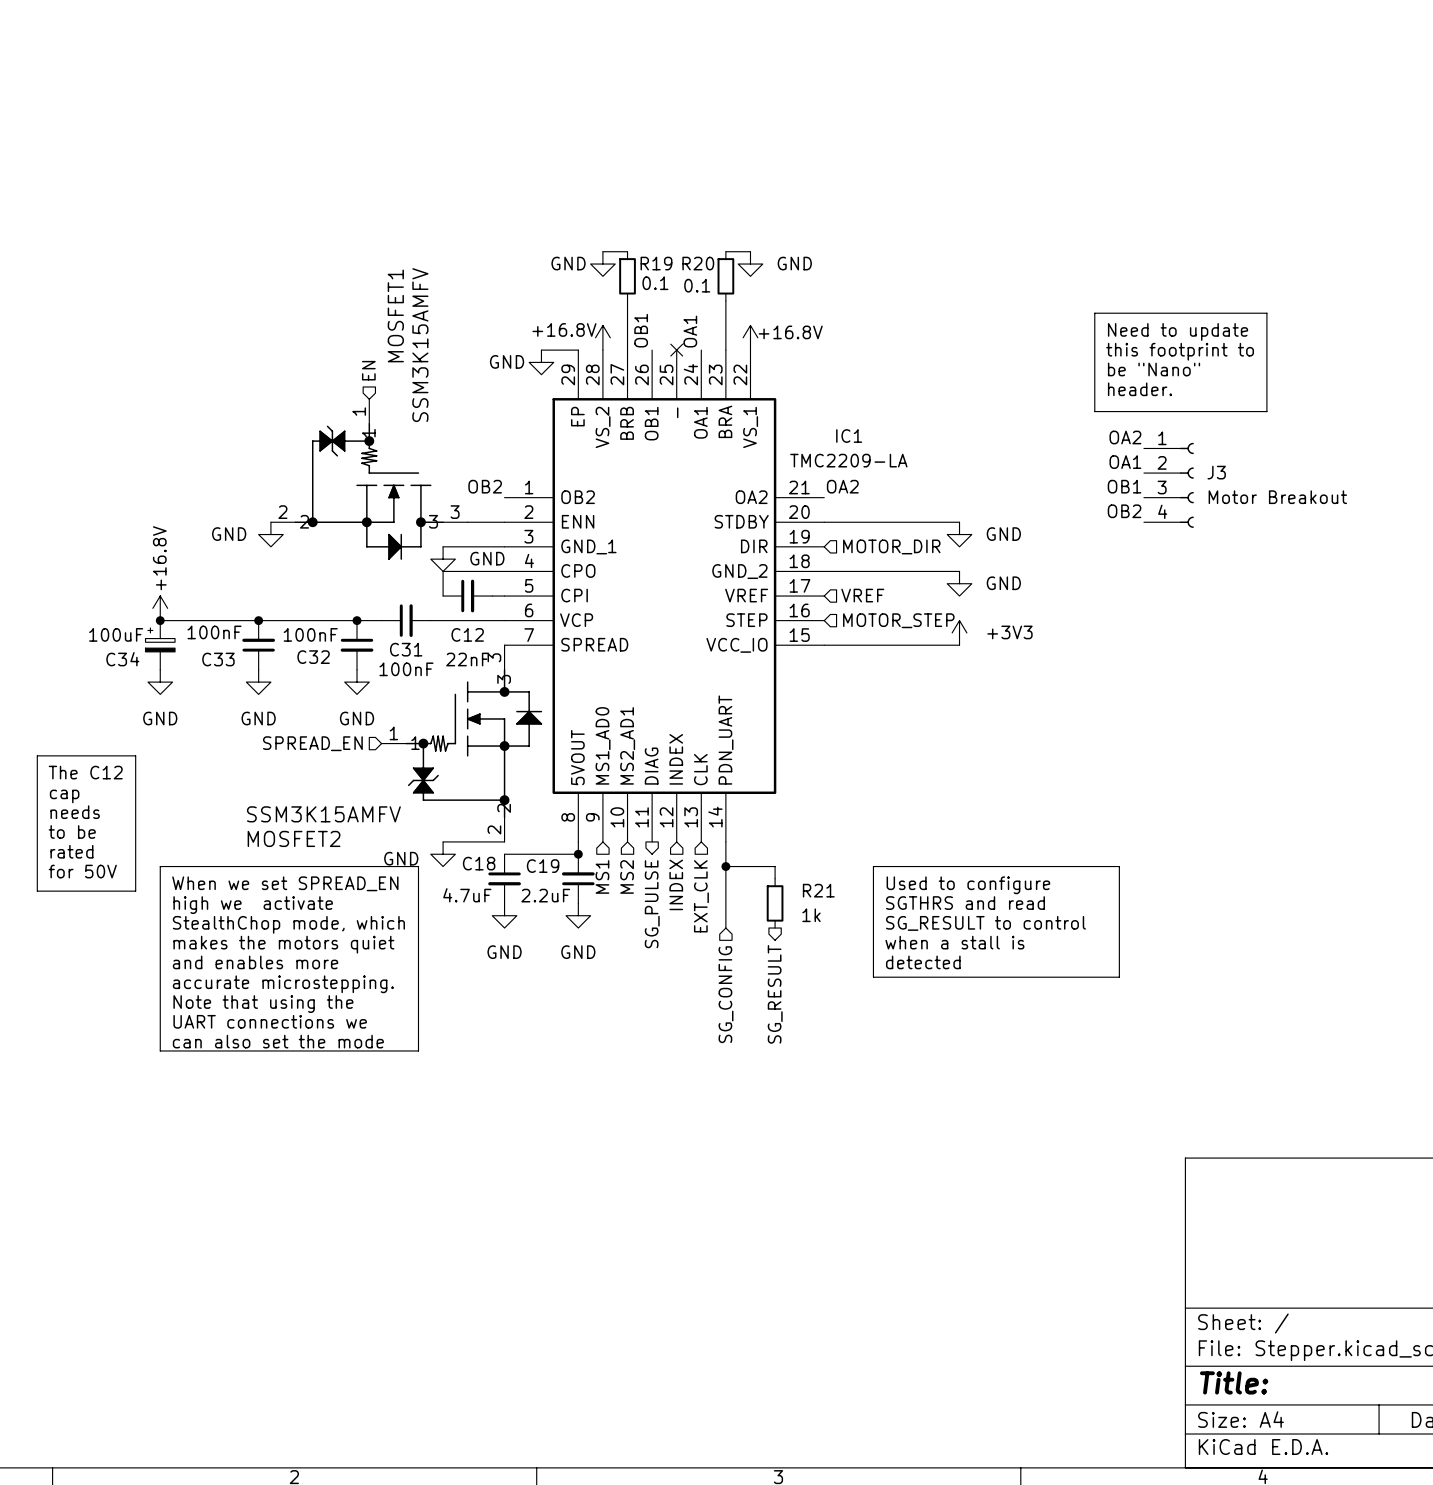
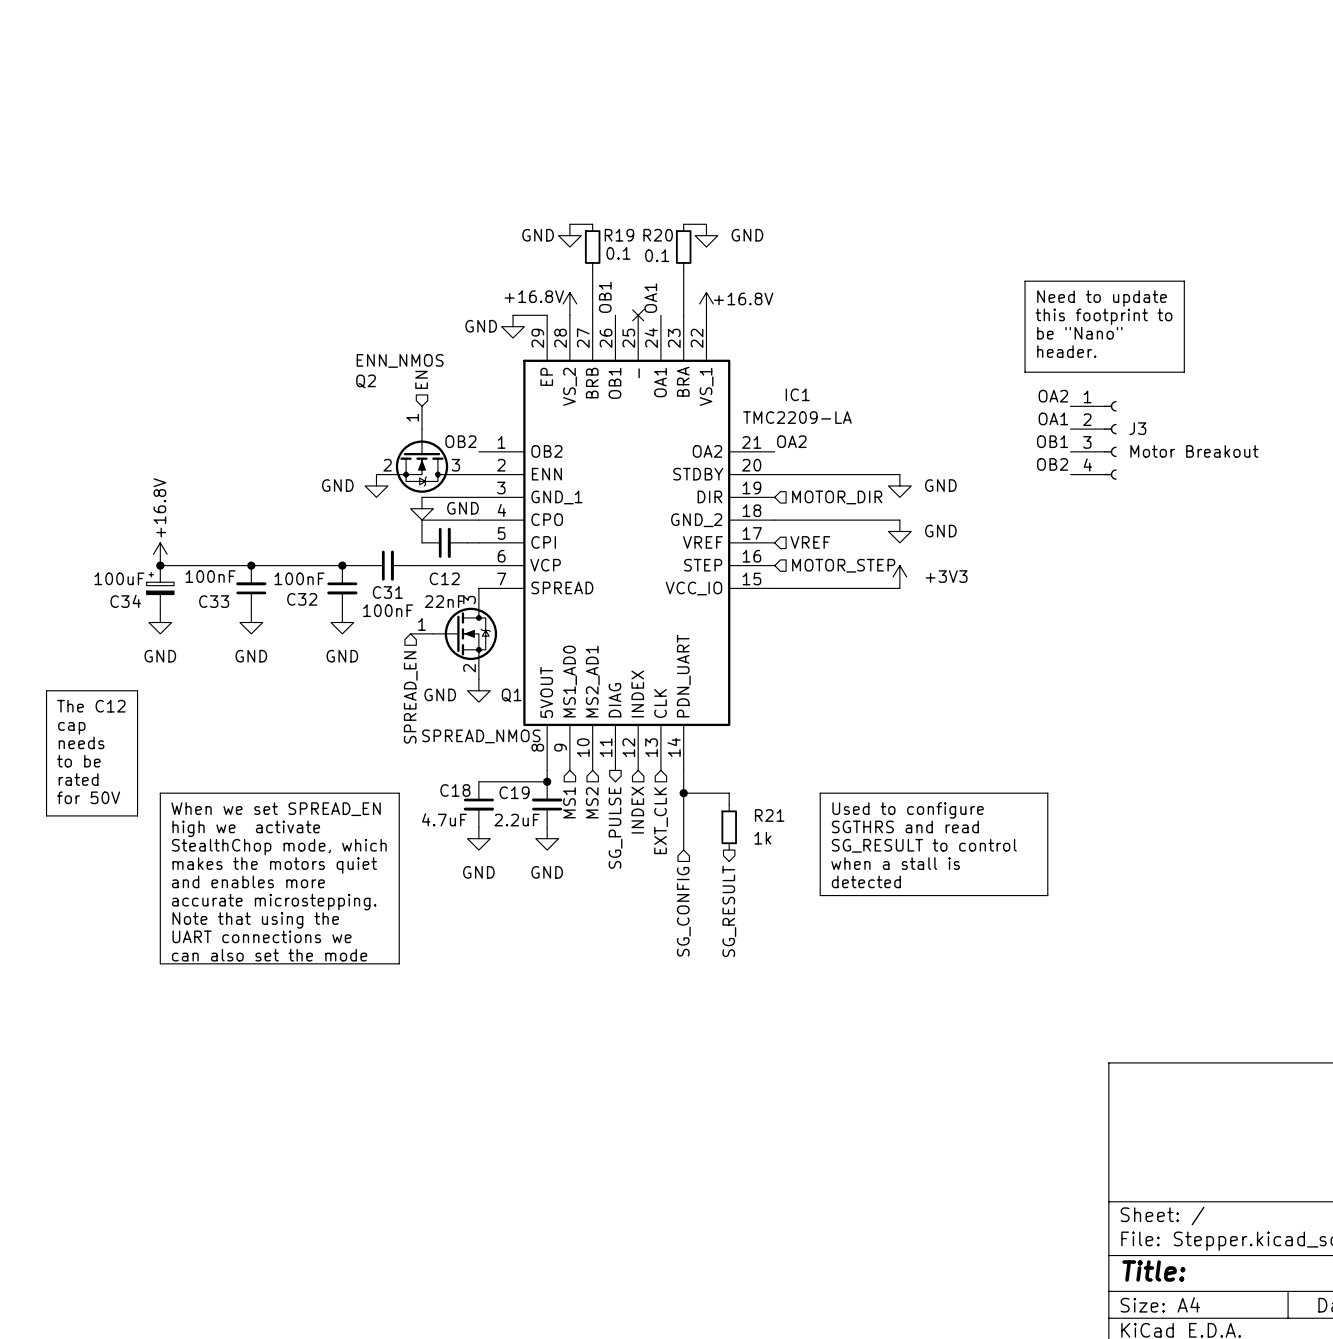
hierarchical label position: EN (368, 370) -> EN (421, 379)
MOSFET1: SSM3K15AMFV (369, 479) -> none
Q2: none -> ENN_NMOS (422, 449)
power symbol position: GND (270, 534) -> GND (376, 485)
Q1: none -> SPREAD_NMOS (453, 633)
hierarchical label rotation: 0° (312, 743) -> 90° counterclockwise (410, 697)
hierarchical label position: SPREAD_EN (312, 743) -> SPREAD_EN (410, 697)
MOSFET2: SSM3K15AMFV (461, 743) -> none
wire: (443, 841) (504, 841) -> none
power symbol position: GND (443, 854) -> GND (478, 690)

